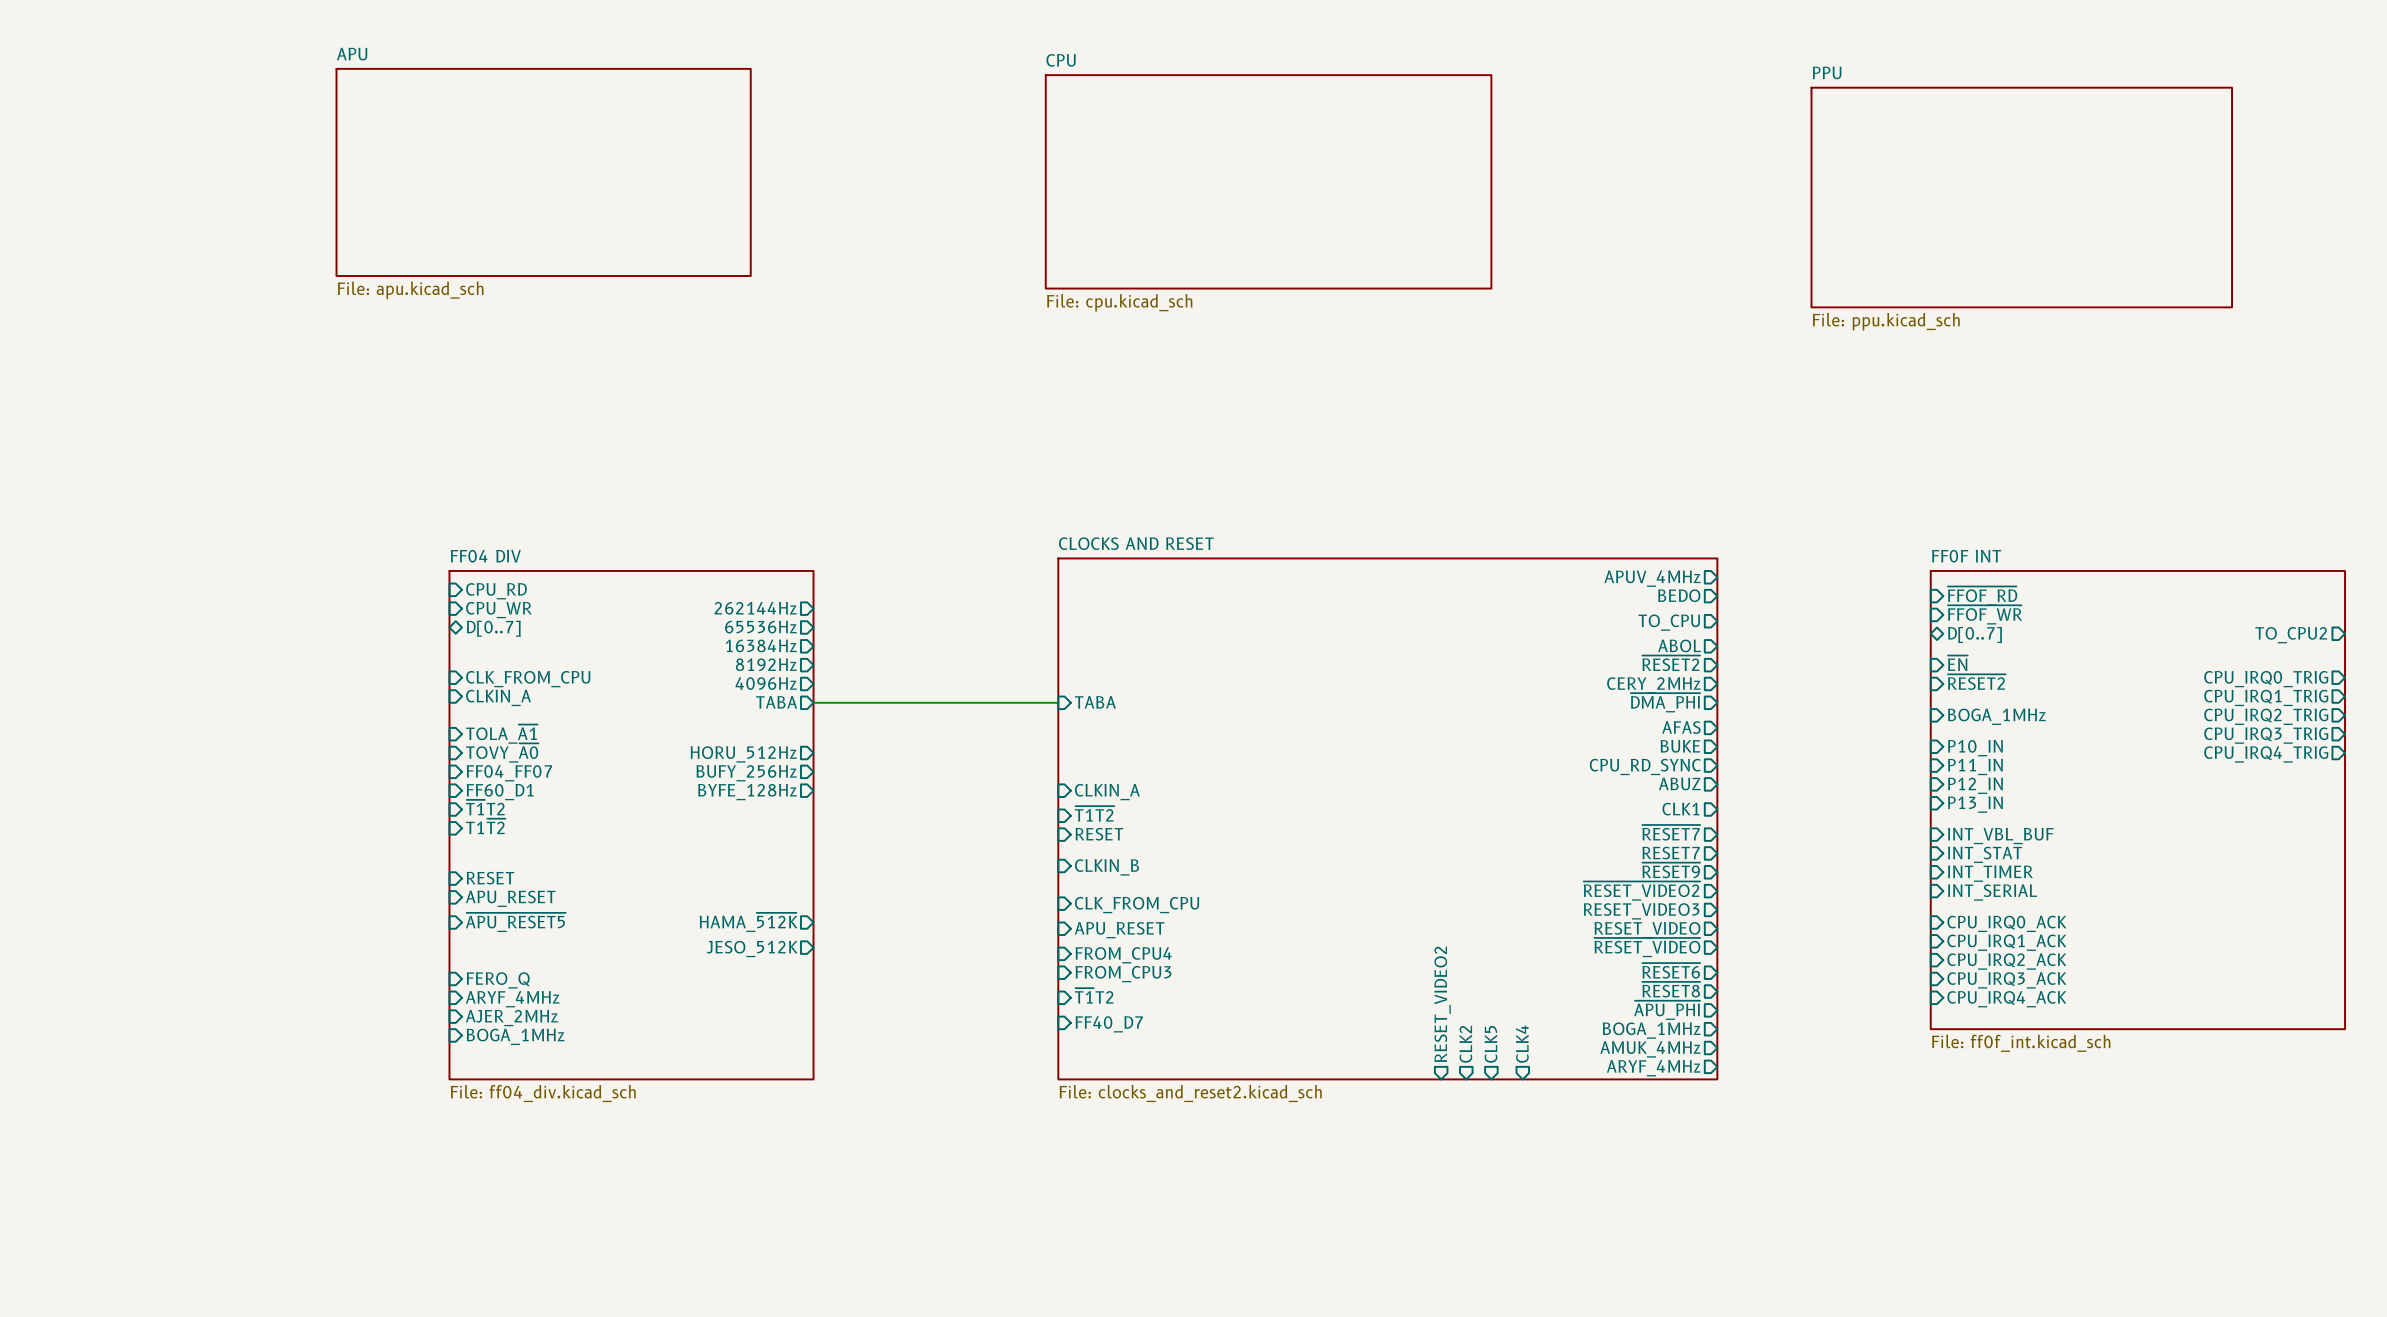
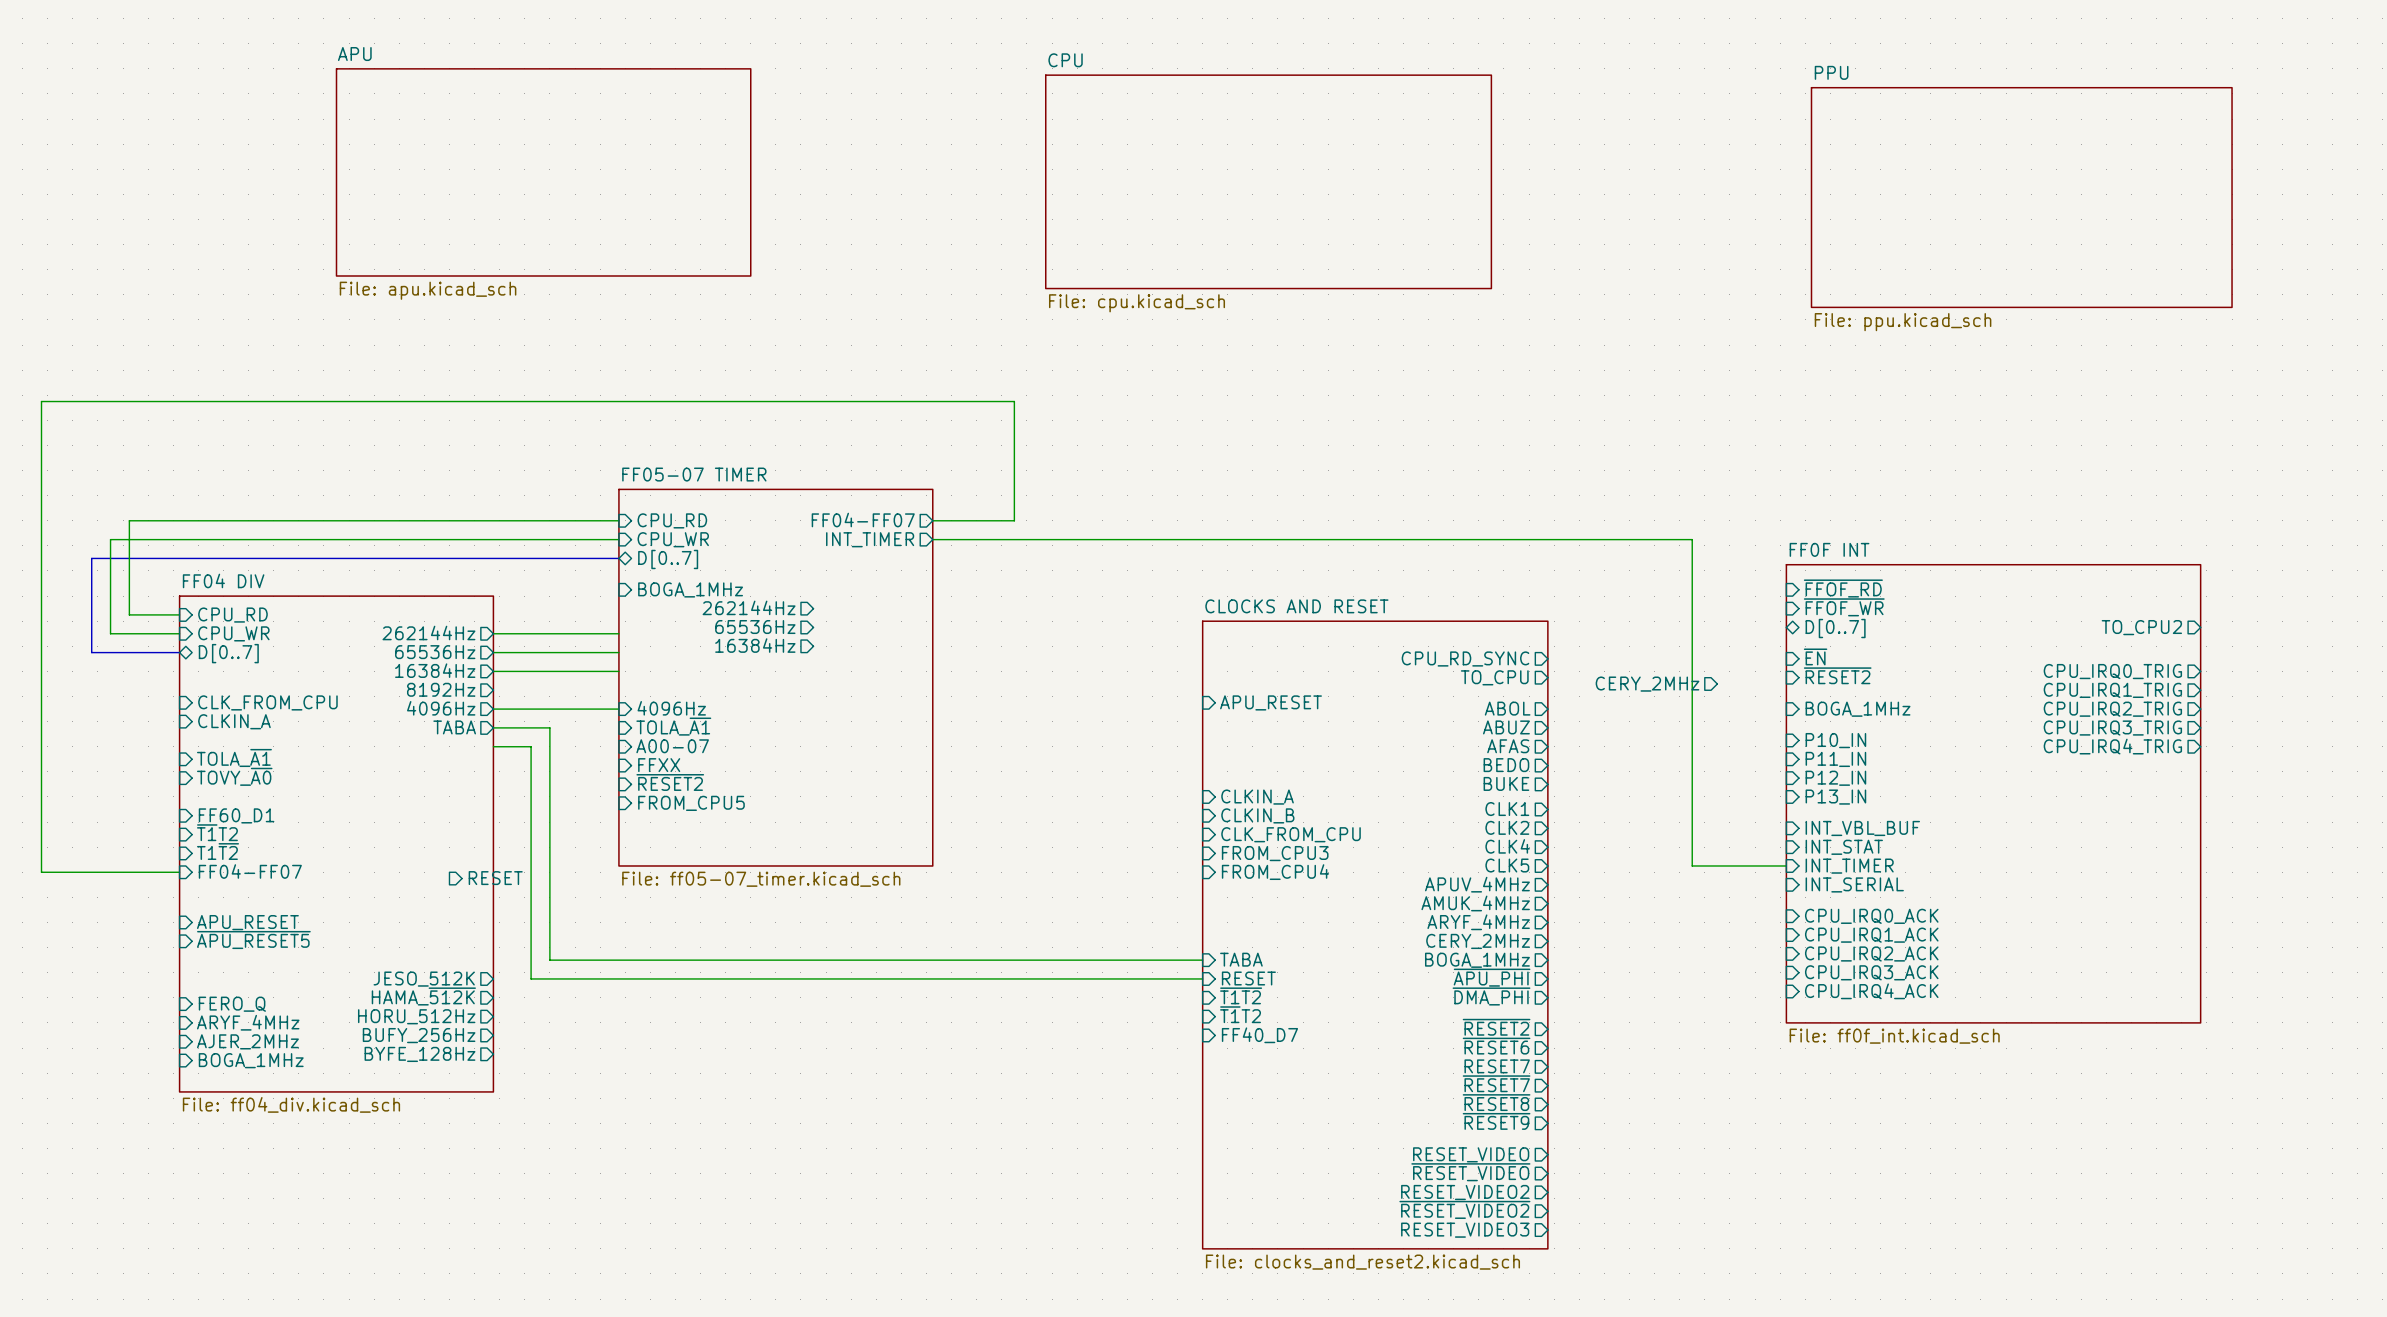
wire: none -> (618, 520) (129, 520) (129, 614) (179, 614)
sheet pin: none -> FF04-FF07 (863, 520)
wire: none -> (932, 520) (1014, 520) (1014, 401) (41, 401) (41, 872) (179, 872)
sheet pin: none -> CPU_RD (672, 520)
wire: none -> (618, 539) (110, 539) (110, 633) (179, 633)
wire: none -> (932, 539) (1692, 539) (1692, 865) (1786, 865)
sheet pin: none -> CPU_WR (673, 539)
sheet pin: none -> INT_TIMER (870, 539)
sheet FF04 DIV name position: FF04 DIV (485, 556) -> FF04 DIV (223, 580)
bus: none -> (618, 558) (91, 558) (91, 652) (179, 652)
sheet pin: none -> D[0..7] (668, 559)
sheet FF04 DIV shape: [448, 570, 815, 1081] -> [178, 595, 495, 1093]
sheet pin: APUV_4MHz (1652, 578) -> none
sheet pin: CPU_RD (496, 591) -> none
sheet pin: none -> BOGA_1MHz (690, 589)
sheet pin position: BEDO (1679, 595) -> BEDO (1506, 765)
sheet pin position: ~{FFOF_RD} (1982, 596) -> ~{FFOF_RD} (1843, 588)
sheet pin: CPU_WR (498, 610) -> none
sheet pin position: ~{FFOF_WR} (1985, 614) -> ~{FFOF_WR} (1844, 607)
sheet pin: none -> CPU_RD (232, 615)
sheet pin position: TO_CPU (1669, 622) -> TO_CPU (1494, 677)
sheet pin: D[0..7] (493, 628) -> none
sheet pin: none -> 262144Hz (428, 632)
wire: none -> (493, 633) (618, 633)
sheet pin: none -> CPU_WR (233, 633)
sheet pin position: D[0..7] (1975, 635) -> D[0..7] (1835, 628)
sheet pin position: TO_CPU2 (2291, 635) -> TO_CPU2 (2141, 627)
sheet pin position: ABOL (1679, 645) -> ABOL (1507, 708)
sheet pin: none -> 65536Hz (435, 652)
wire: none -> (493, 652) (618, 652)
sheet pin: none -> D[0..7] (228, 653)
sheet pin: ~{RESET2} (1671, 663) -> none
sheet pin position: ~{EN} (1957, 663) -> ~{EN} (1815, 656)
sheet pin: 8192Hz (766, 664) -> none
sheet pin: none -> 16384Hz (435, 670)
wire: none -> (493, 671) (618, 671)
sheet pin: none -> ~{RESET2} (1837, 675)
sheet FF05-07 TIMER: none -> File: ff05-07_timer.kicad_sch (775, 677)
sheet pin: CLK_FROM_CPU (528, 679) -> none
sheet pin position: CPU_IRQ0_TRIG (2266, 679) -> CPU_IRQ0_TRIG (2112, 671)
sheet pin: ~{RESET2} (1976, 682) -> none
sheet pin: 4096Hz (766, 683) -> none
sheet pin: none -> 8192Hz (441, 689)
sheet pin: CLKIN_A (498, 697) -> none
sheet pin position: CPU_IRQ1_TRIG (2266, 697) -> CPU_IRQ1_TRIG (2112, 690)
sheet pin: TABA (776, 702) -> none
wire: (813, 702) (1058, 702) -> none
sheet pin: TABA (1095, 702) -> none
sheet pin: ~{DMA_PHI} (1665, 702) -> none
sheet pin: none -> CLK_FROM_CPU (267, 702)
sheet pin: none -> APU_RESET (1271, 702)
sheet pin: none -> 4096Hz (441, 708)
sheet pin: none -> 4096Hz (671, 708)
wire: none -> (493, 709) (618, 709)
sheet pin position: BOGA_1MHz (1996, 716) -> BOGA_1MHz (1858, 709)
sheet pin position: CPU_IRQ2_TRIG (2266, 716) -> CPU_IRQ2_TRIG (2112, 709)
sheet pin: none -> CLKIN_A (234, 721)
sheet pin: none -> TABA (454, 727)
wire: none -> (493, 727) (549, 727) (549, 960) (1202, 960)
sheet pin: none -> TOLA_~{A1} (673, 726)
sheet pin position: AFAS (1681, 727) -> AFAS (1508, 746)
sheet pin: TOLA_~{A1} (501, 734) -> none
sheet pin position: CPU_IRQ3_TRIG (2266, 735) -> CPU_IRQ3_TRIG (2112, 728)
wire: none -> (493, 746) (531, 746) (531, 978) (1202, 978)
sheet pin: none -> A00-07 (672, 746)
sheet pin position: BUKE (1680, 746) -> BUKE (1506, 783)
sheet pin position: P10_IN (1975, 748) -> P10_IN (1835, 740)
sheet pin: TOVY_~{A0} (502, 752) -> none
sheet pin: HORU_512Hz (743, 754) -> none
sheet pin position: CPU_IRQ4_TRIG (2266, 754) -> CPU_IRQ4_TRIG (2112, 746)
sheet pin: none -> TOLA_~{A1} (234, 757)
sheet pin: none -> FFXX (659, 765)
sheet pin position: CPU_RD_SYNC (1645, 766) -> CPU_RD_SYNC (1465, 658)
sheet pin position: P11_IN (1975, 766) -> P11_IN (1835, 759)
sheet pin: FF04_FF07 (509, 773) -> none
sheet pin: BUFY_256Hz (746, 773) -> none
sheet pin: none -> TOVY_~{A0} (234, 776)
sheet pin: none -> ~{RESET2} (670, 782)
sheet pin position: ABUZ (1679, 784) -> ABUZ (1506, 727)
sheet pin position: P12_IN (1975, 785) -> P12_IN (1835, 778)
sheet pin: FF60_D1 (500, 792) -> none
sheet pin: BYFE_128Hz (747, 792) -> none
sheet pin position: CLKIN_A (1107, 792) -> CLKIN_A (1257, 797)
sheet FF0F INT position: (2137, 800) -> (1993, 793)
sheet pin: none -> FROM_CPU5 (691, 803)
sheet pin position: P13_IN (1975, 804) -> P13_IN (1835, 797)
sheet pin: ~{T1}T2 (485, 807) -> none
sheet pin position: CLK1 (1680, 809) -> CLK1 (1507, 809)
sheet pin position: ~{T1T2} (1094, 813) -> ~{T1T2} (1241, 995)
sheet pin: none -> FF60_D1 (236, 815)
sheet CLOCKS AND RESET: File: clocks_and_reset2.kicad_sch (1387, 818) -> none
sheet pin: T1~{T2} (485, 826) -> none
sheet pin: none -> ~{T1}T2 (217, 832)
sheet pin: ~{RESET7} (1671, 832) -> none
sheet pin position: RESET (1099, 834) -> RESET (1248, 978)
sheet pin position: INT_VBL_BUF (2000, 836) -> INT_VBL_BUF (1862, 828)
sheet pin: none -> T1~{T2} (218, 851)
sheet pin: RESET7 (1671, 853) -> none
sheet pin position: INT_STAT (1984, 854) -> INT_STAT (1844, 847)
sheet pin position: CLKIN_B (1106, 867) -> CLKIN_B (1257, 815)
sheet pin: ~{RESET9} (1671, 870) -> none
sheet pin: none -> FF04-FF07 (250, 871)
sheet pin position: INT_TIMER (1990, 873) -> INT_TIMER (1849, 866)
sheet pin: none -> APUV_4MHz (1477, 884)
sheet pin: ~{RESET_VIDEO2} (1641, 891) -> none
sheet pin position: INT_SERIAL (1992, 892) -> INT_SERIAL (1854, 884)
sheet pin: APU_RESET (510, 898) -> none
sheet pin position: CLK_FROM_CPU (1137, 905) -> CLK_FROM_CPU (1291, 834)
sheet pin: RESET_VIDEO3 (1641, 911) -> none
sheet pin: ~{APU_RESET5} (515, 922) -> none
sheet pin: HAMA_~{512K} (748, 922) -> none
sheet pin: none -> APU_RESET (247, 922)
sheet pin position: CPU_IRQ0_ACK (2006, 923) -> CPU_IRQ0_ACK (1871, 916)
sheet pin: APU_RESET (1119, 930) -> none
sheet pin: RESET_VIDEO (1647, 930) -> none
sheet CLOCKS AND RESET: none -> File: clocks_and_reset2.kicad_sch (1375, 935)
sheet pin: none -> ~{APU_RESET5} (253, 940)
sheet pin: none -> CERY_2MHz (1478, 941)
sheet pin position: CPU_IRQ1_ACK (2006, 942) -> CPU_IRQ1_ACK (1871, 935)
sheet pin: ~{RESET_VIDEO} (1647, 947) -> none
sheet pin: JESO_512K (752, 949) -> none
sheet pin position: FROM_CPU4 (1123, 955) -> FROM_CPU4 (1275, 872)
sheet pin: none -> TABA (1241, 959)
sheet pin: none -> BOGA_1MHz (1477, 960)
sheet pin position: CPU_IRQ2_ACK (2006, 961) -> CPU_IRQ2_ACK (1871, 953)
sheet pin position: ~{RESET6} (1671, 970) -> ~{RESET6} (1496, 1046)
sheet pin position: FROM_CPU3 (1123, 974) -> FROM_CPU3 (1275, 853)
sheet pin: none -> JESO_512K (424, 979)
sheet pin: FERO_Q (498, 980) -> none
sheet pin position: CPU_IRQ3_ACK (2006, 980) -> CPU_IRQ3_ACK (1871, 972)
sheet pin position: ~{RESET8} (1671, 989) -> ~{RESET8} (1496, 1102)
sheet pin position: ~{T1}T2 (1094, 995) -> ~{T1}T2 (1240, 1014)
sheet pin: none -> HAMA_~{512K} (423, 996)
sheet pin: none -> ~{DMA_PHI} (1491, 996)
sheet pin: ARYF_4MHz (512, 999) -> none
sheet pin position: CPU_IRQ4_ACK (2006, 999) -> CPU_IRQ4_ACK (1871, 991)
sheet pin rotation: 0° (1442, 1004) -> 90° counterclockwise (1465, 1192)
sheet pin position: RESET_VIDEO2 (1442, 1004) -> RESET_VIDEO2 (1465, 1192)
sheet pin: none -> FERO_Q (232, 1004)
sheet pin position: ~{APU_PHI} (1667, 1010) -> ~{APU_PHI} (1492, 977)
sheet pin: none -> HORU_512Hz (416, 1016)
sheet pin: AJER_2MHz (511, 1018) -> none
sheet pin: none -> ARYF_4MHz (248, 1022)
sheet pin position: FF40_D7 (1109, 1024) -> FF40_D7 (1259, 1035)
sheet pin: none -> ~{RESET2} (1496, 1027)
sheet pin: BOGA_1MHz (1651, 1030) -> none
sheet pin: none -> BUFY_256Hz (419, 1035)
sheet pin: BOGA_1MHz (515, 1036) -> none
sheet pin: none -> AJER_2MHz (247, 1041)
sheet pin rotation: 0° (1465, 1044) -> 90° counterclockwise (1507, 827)
sheet pin position: CLK2 (1465, 1044) -> CLK2 (1507, 827)
sheet pin rotation: 0° (1490, 1044) -> 90° counterclockwise (1507, 865)
sheet pin position: CLK5 (1490, 1044) -> CLK5 (1507, 865)
sheet pin rotation: 0° (1522, 1044) -> 90° counterclockwise (1507, 846)
sheet pin position: CLK4 (1522, 1044) -> CLK4 (1507, 846)
sheet pin position: AMUK_4MHz (1650, 1049) -> AMUK_4MHz (1475, 903)
sheet pin: none -> BYFE_128Hz (419, 1054)
sheet pin: none -> BOGA_1MHz (251, 1060)
sheet pin: none -> RESET7 (1497, 1066)
sheet pin position: ARYF_4MHz (1653, 1068) -> ARYF_4MHz (1478, 922)
sheet pin: none -> ~{RESET7} (1496, 1083)
sheet FF04 DIV value position: File: ff04_div.kicad_sch (543, 1093) -> File: ff04_div.kicad_sch (291, 1104)
sheet pin: none -> ~{RESET9} (1496, 1121)
sheet pin: none -> RESET_VIDEO (1471, 1154)
sheet pin: none -> ~{RESET_VIDEO} (1470, 1172)
sheet pin: none -> ~{RESET_VIDEO2} (1464, 1209)
sheet pin: none -> RESET_VIDEO3 (1465, 1230)

